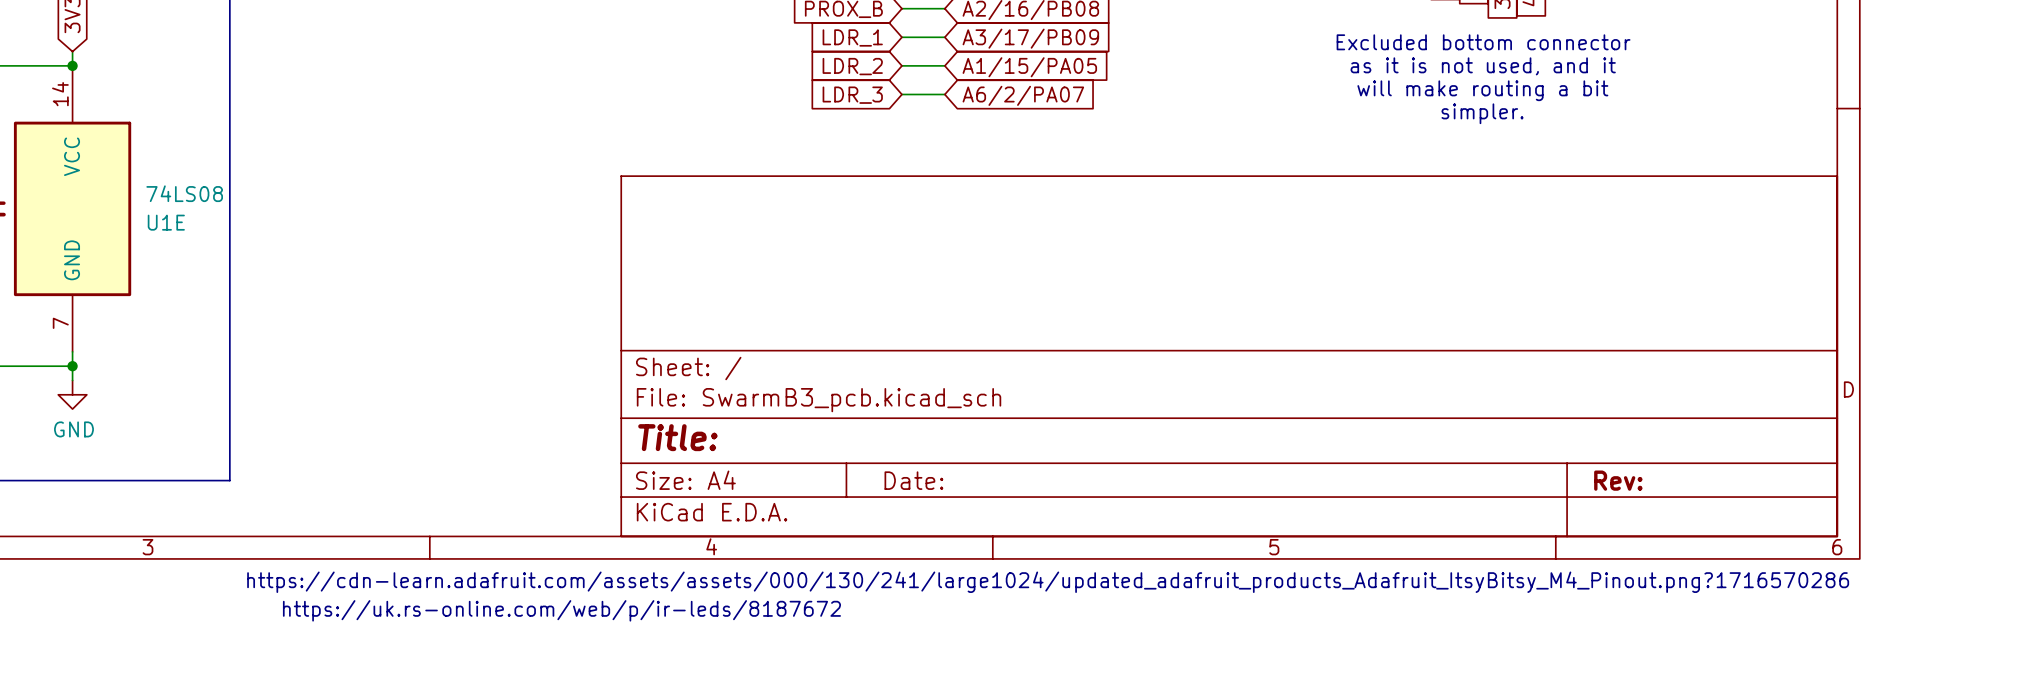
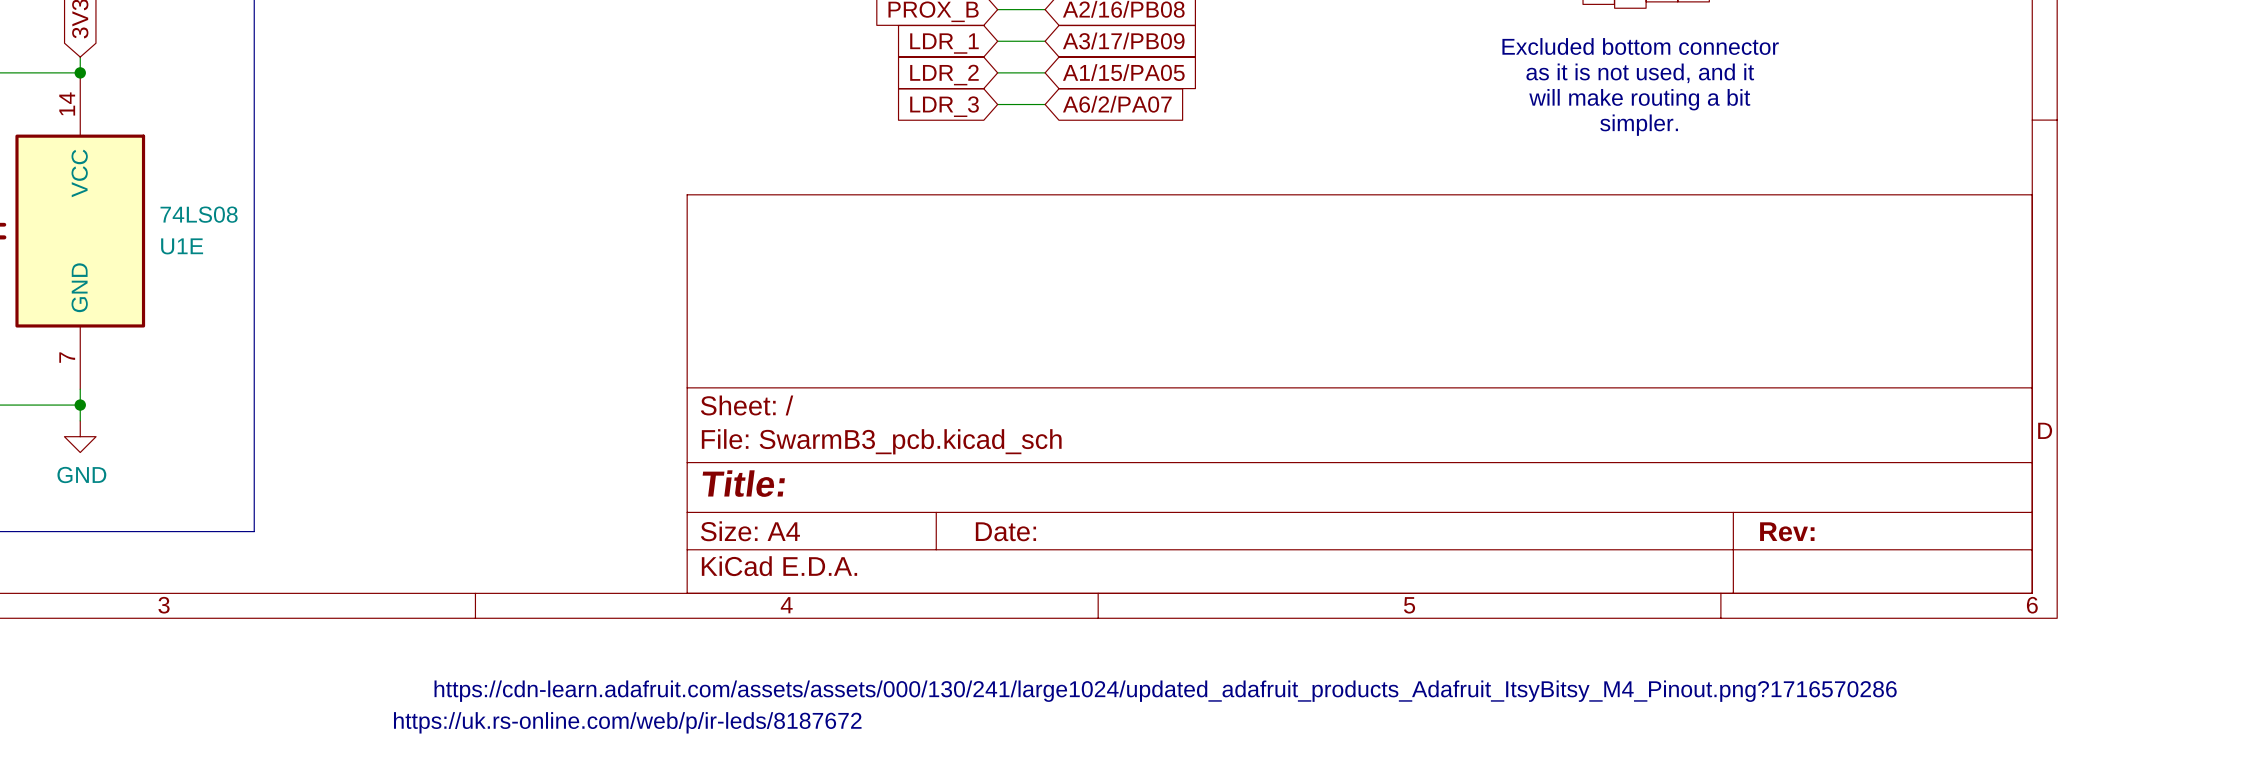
text position: https://cdn-learn.adafruit.com/assets/assets/000/130/241/large1024/updated_adafruit_products_Adafruit_ItsyBitsy_M4_Pinout.png?1716570286 (1048, 582) -> https://cdn-learn.adafruit.com/assets/assets/000/130/241/large1024/updated_adafruit_products_Adafruit_ItsyBitsy_M4_Pinout.png?1716570286 (1165, 691)
text position: https://uk.rs-online.com/web/p/ir-leds/8187672 (561, 610) -> https://uk.rs-online.com/web/p/ir-leds/8187672 (627, 722)

